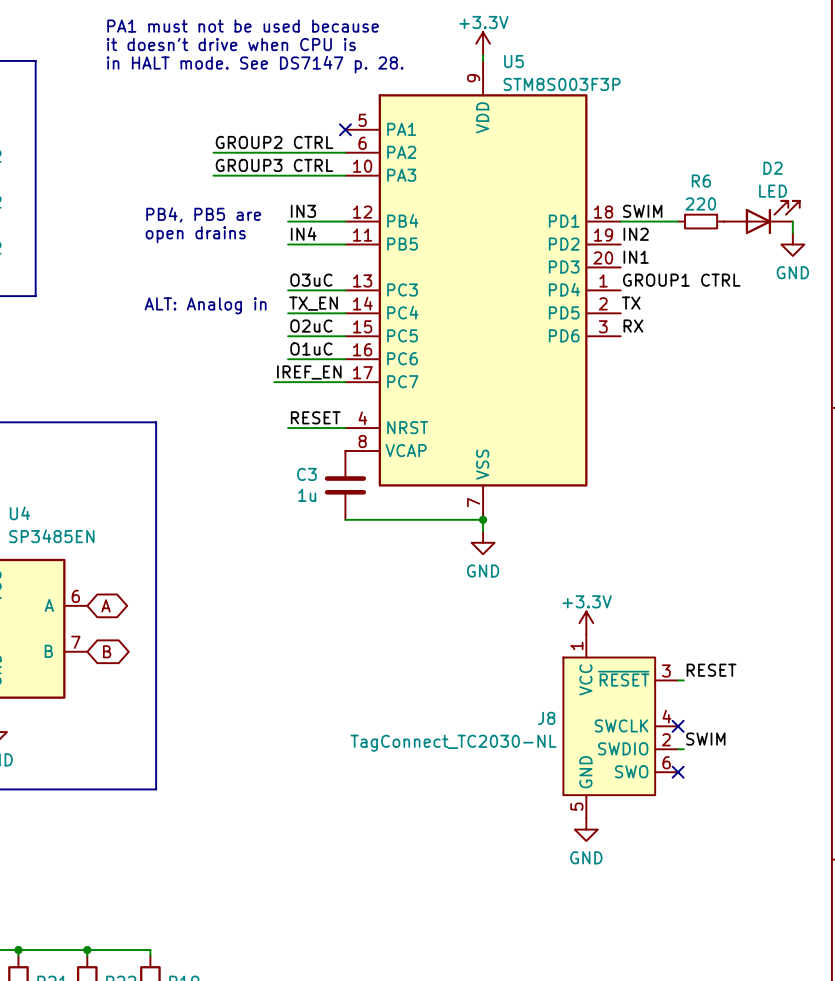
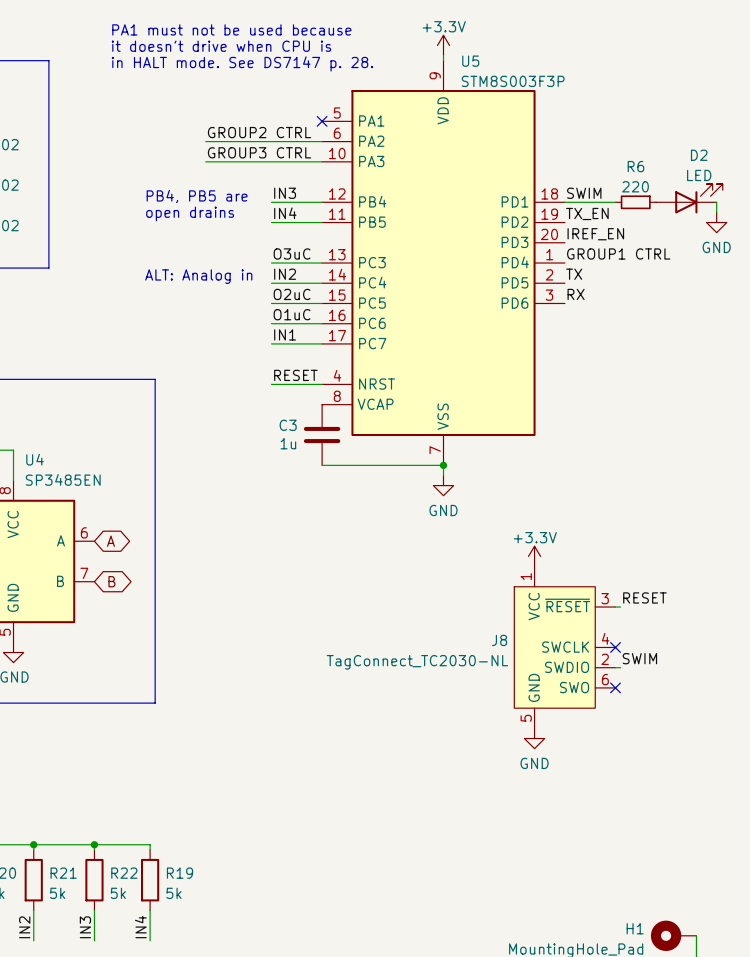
label: IN2 (636, 234) -> TX_EN (587, 213)
label: IN1 (636, 257) -> IREF_EN (595, 234)
label: TX_EN (313, 303) -> IN2 (285, 274)
label: none -> IN1 (285, 334)
label: IREF_EN (309, 372) -> none
wire: (274, 382) (288, 382) -> none

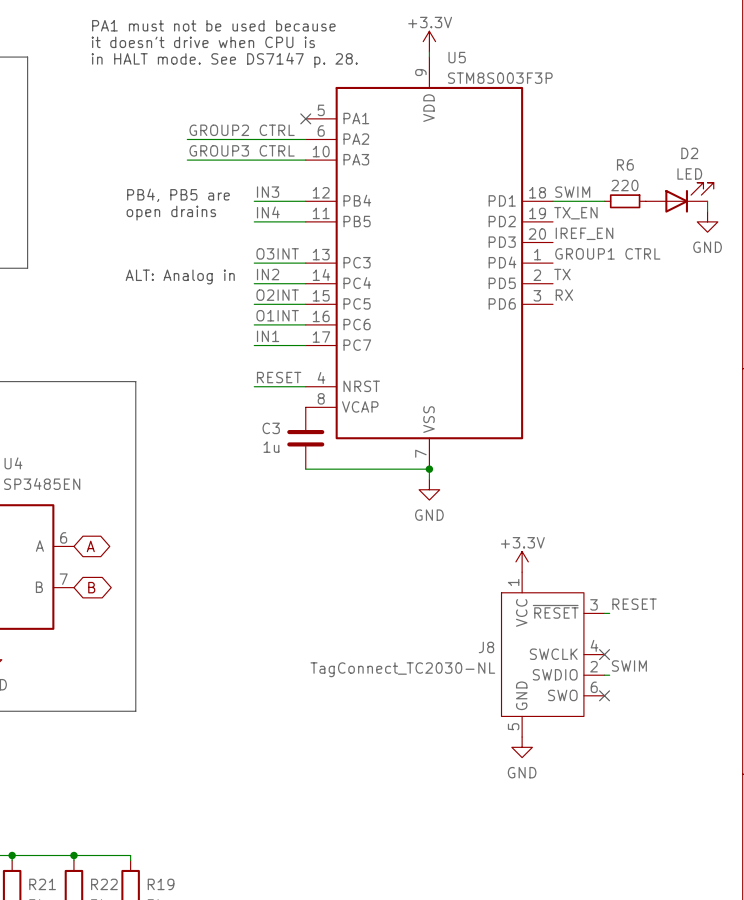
label: O3uC (292, 253) -> O3INT (277, 253)
label: O2uC (292, 294) -> O2INT (277, 295)
label: O1uC (292, 314) -> O1INT (277, 315)

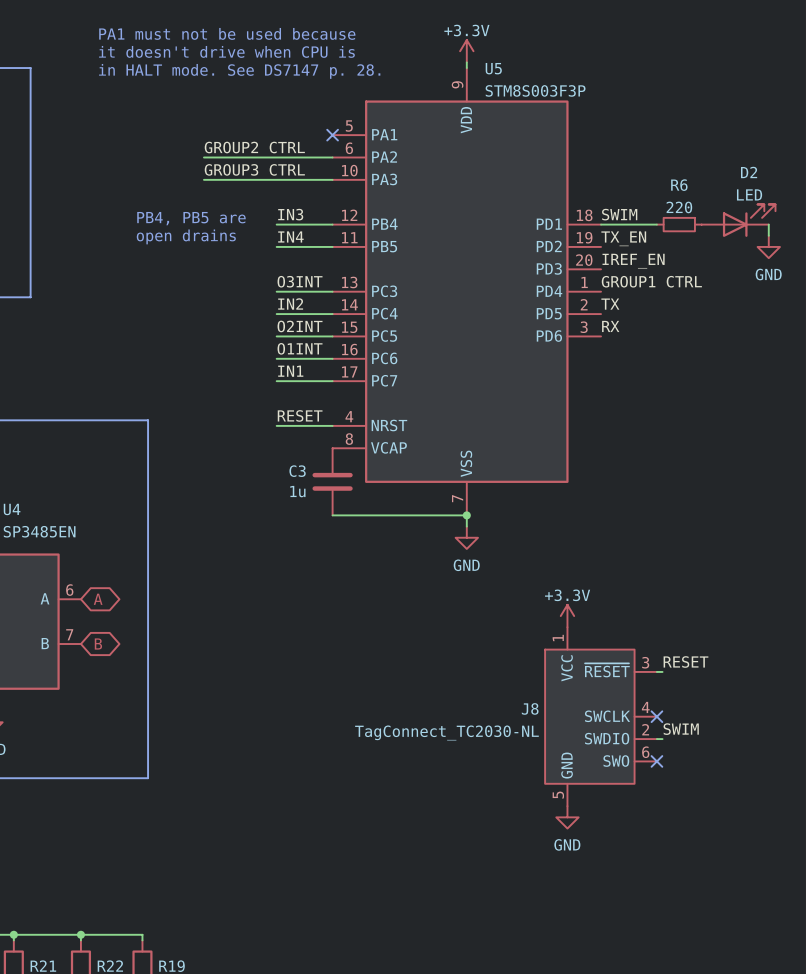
text: ALT: Analog in (180, 276) -> none

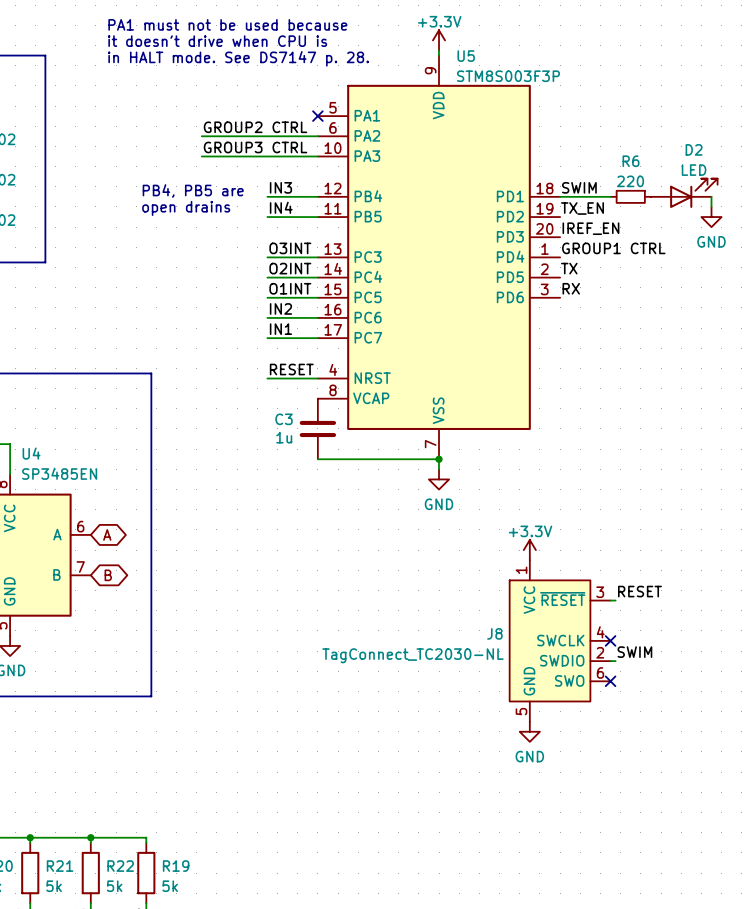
label: IN2 (290, 303) -> O2INT (290, 268)
label: O2INT (300, 326) -> O1INT (290, 288)
label: O1INT (300, 348) -> IN2 (280, 308)

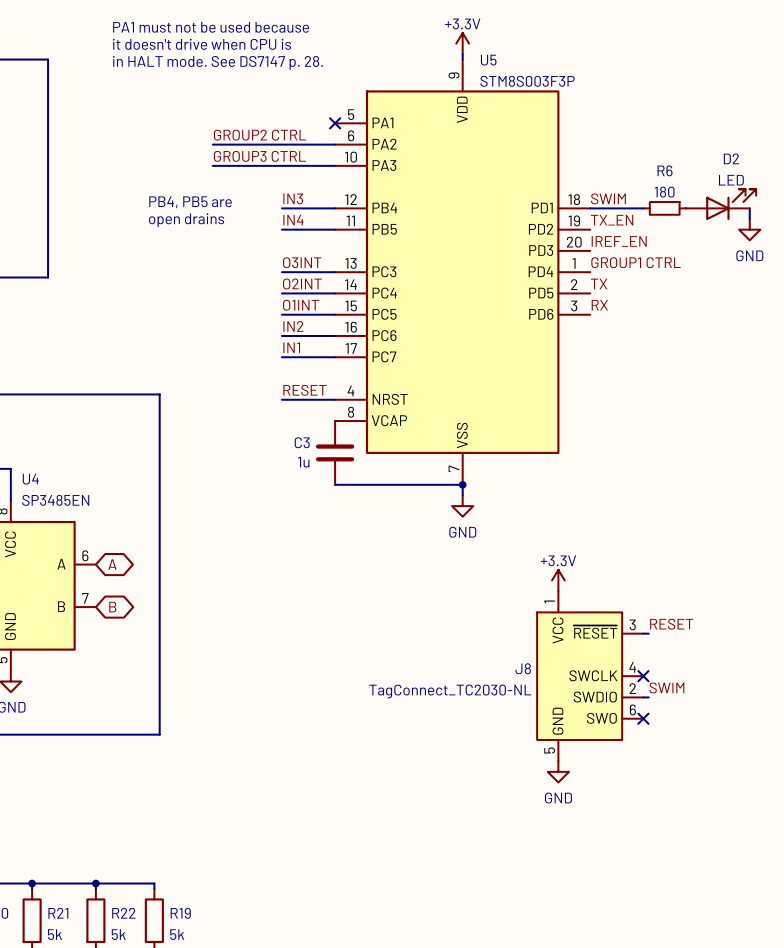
R6 value: 220 (630, 181) -> 180 (664, 192)

